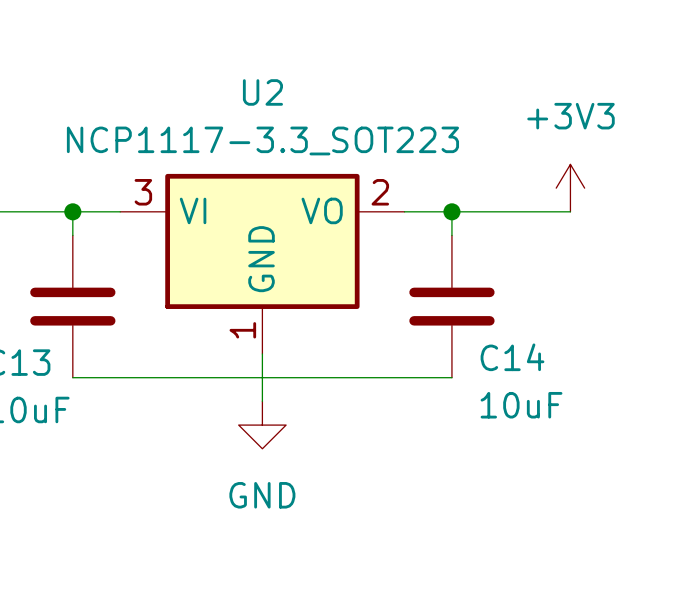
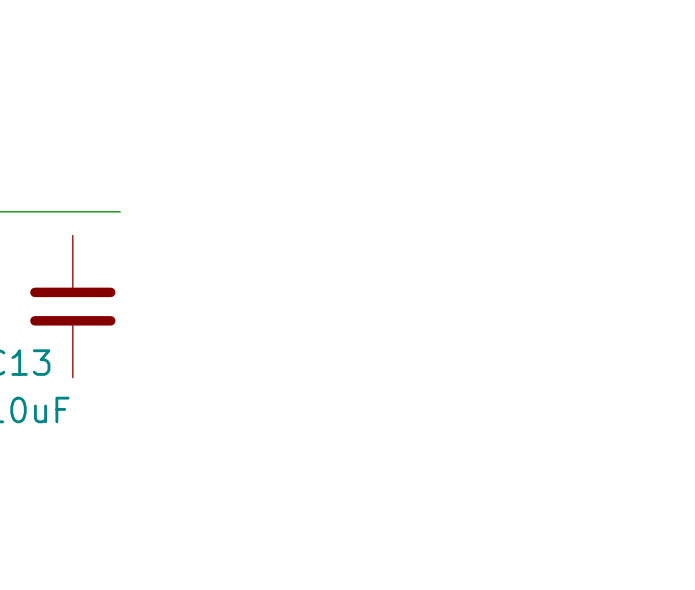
power symbol: +3V3 (570, 188) -> none
wire: (72, 211) (72, 235) -> none
junction: (72, 211) -> none
wire: (404, 211) (570, 211) -> none
wire: (451, 211) (451, 235) -> none
junction: (451, 211) -> none
U2: NCP1117-3.3_SOT223 (262, 263) -> none
C14: 10uF (451, 306) -> none
wire: (262, 354) (262, 401) -> none
wire: (72, 377) (451, 377) -> none
power symbol: GND (262, 425) -> none

